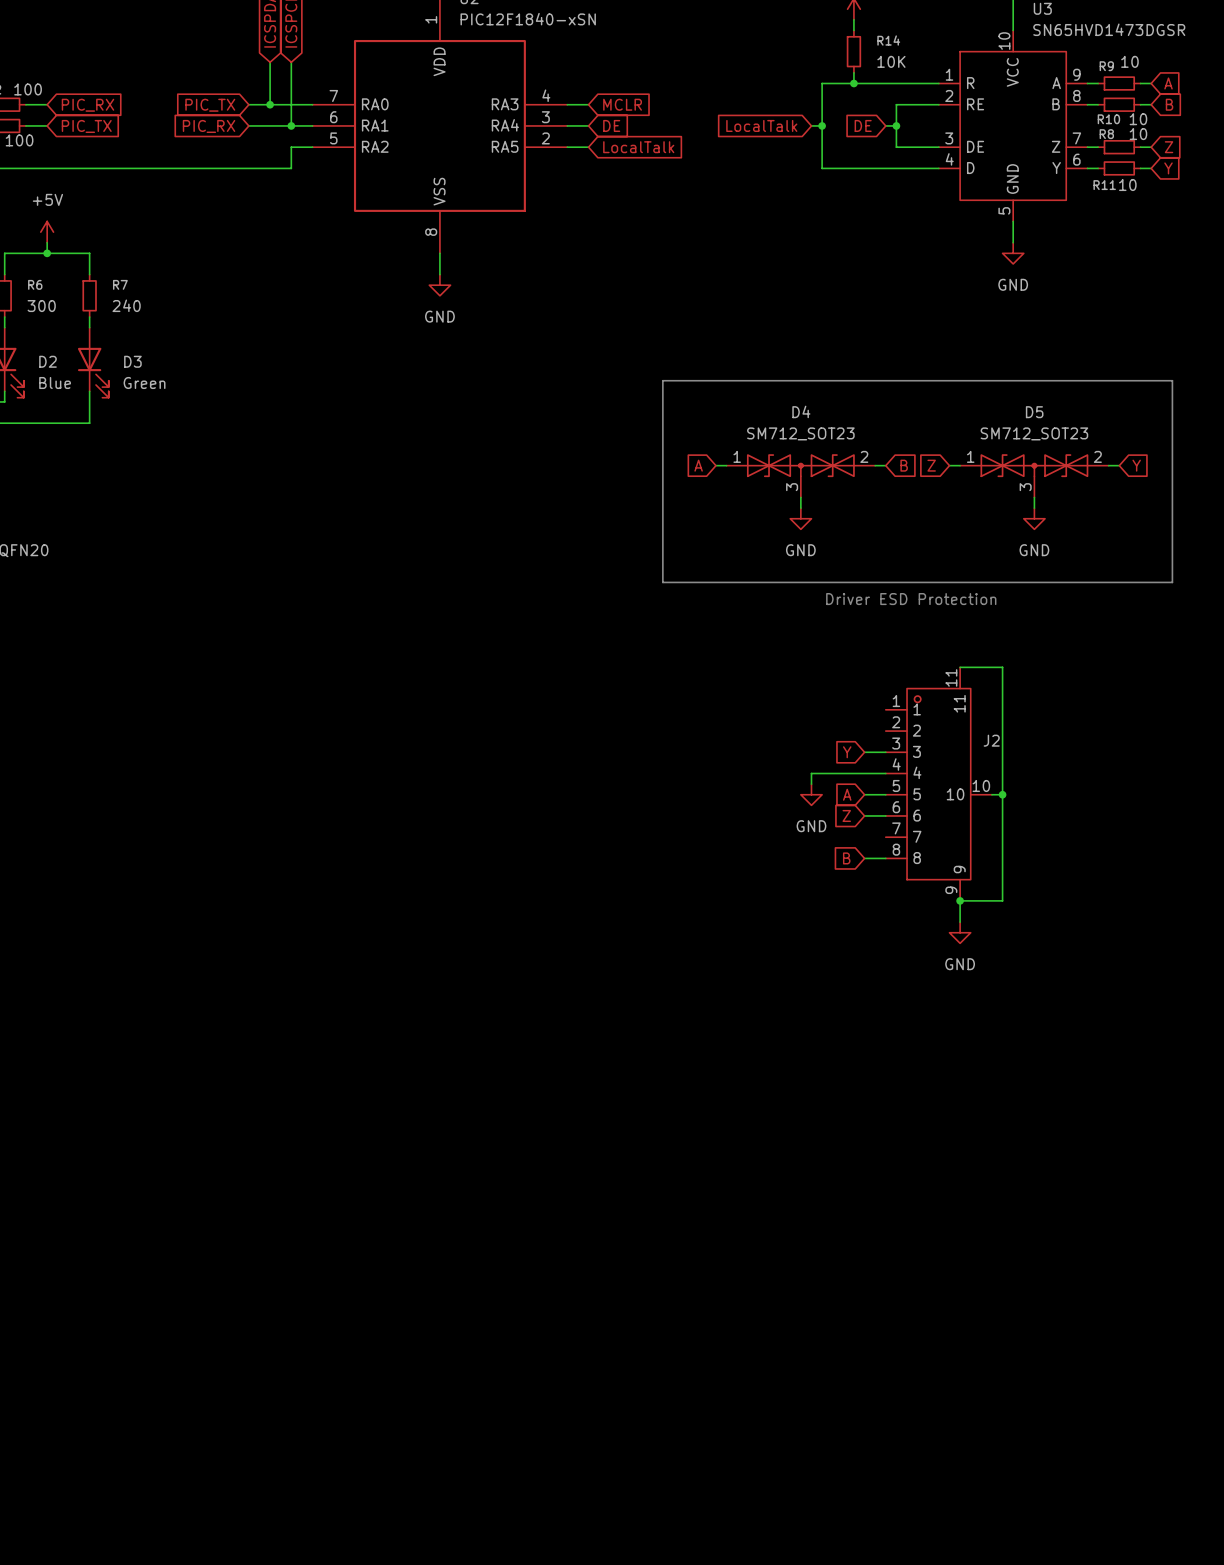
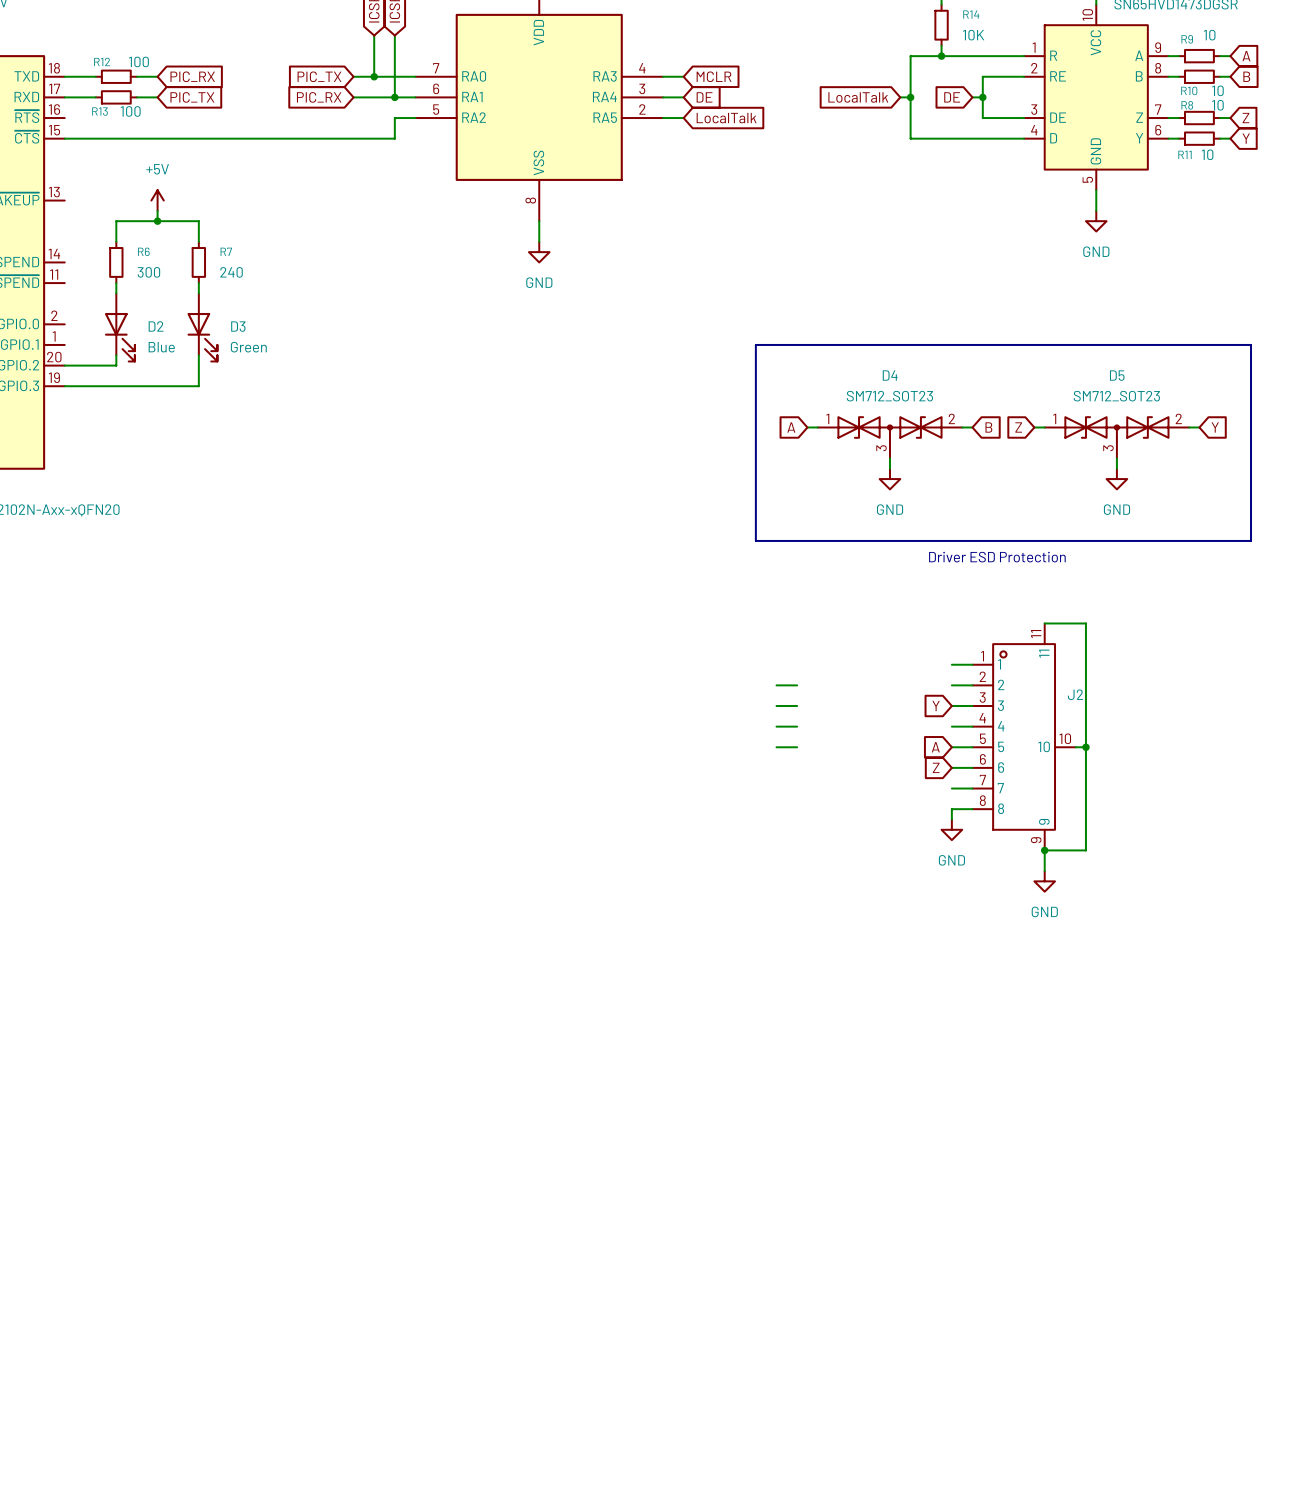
wire: none -> (951, 664) (972, 664)
wire: none -> (776, 685) (797, 685)
wire: none -> (951, 685) (972, 685)
wire: none -> (776, 706) (797, 706)
wire: none -> (776, 726) (797, 726)
wire: (864, 773) (811, 773) (811, 784) -> none
wire: none -> (776, 747) (797, 747)
power symbol position: GND (811, 794) -> GND (951, 829)
wire: none -> (951, 788) (972, 788)
global label: B (846, 858) -> none
wire: none -> (951, 809) (951, 819)

